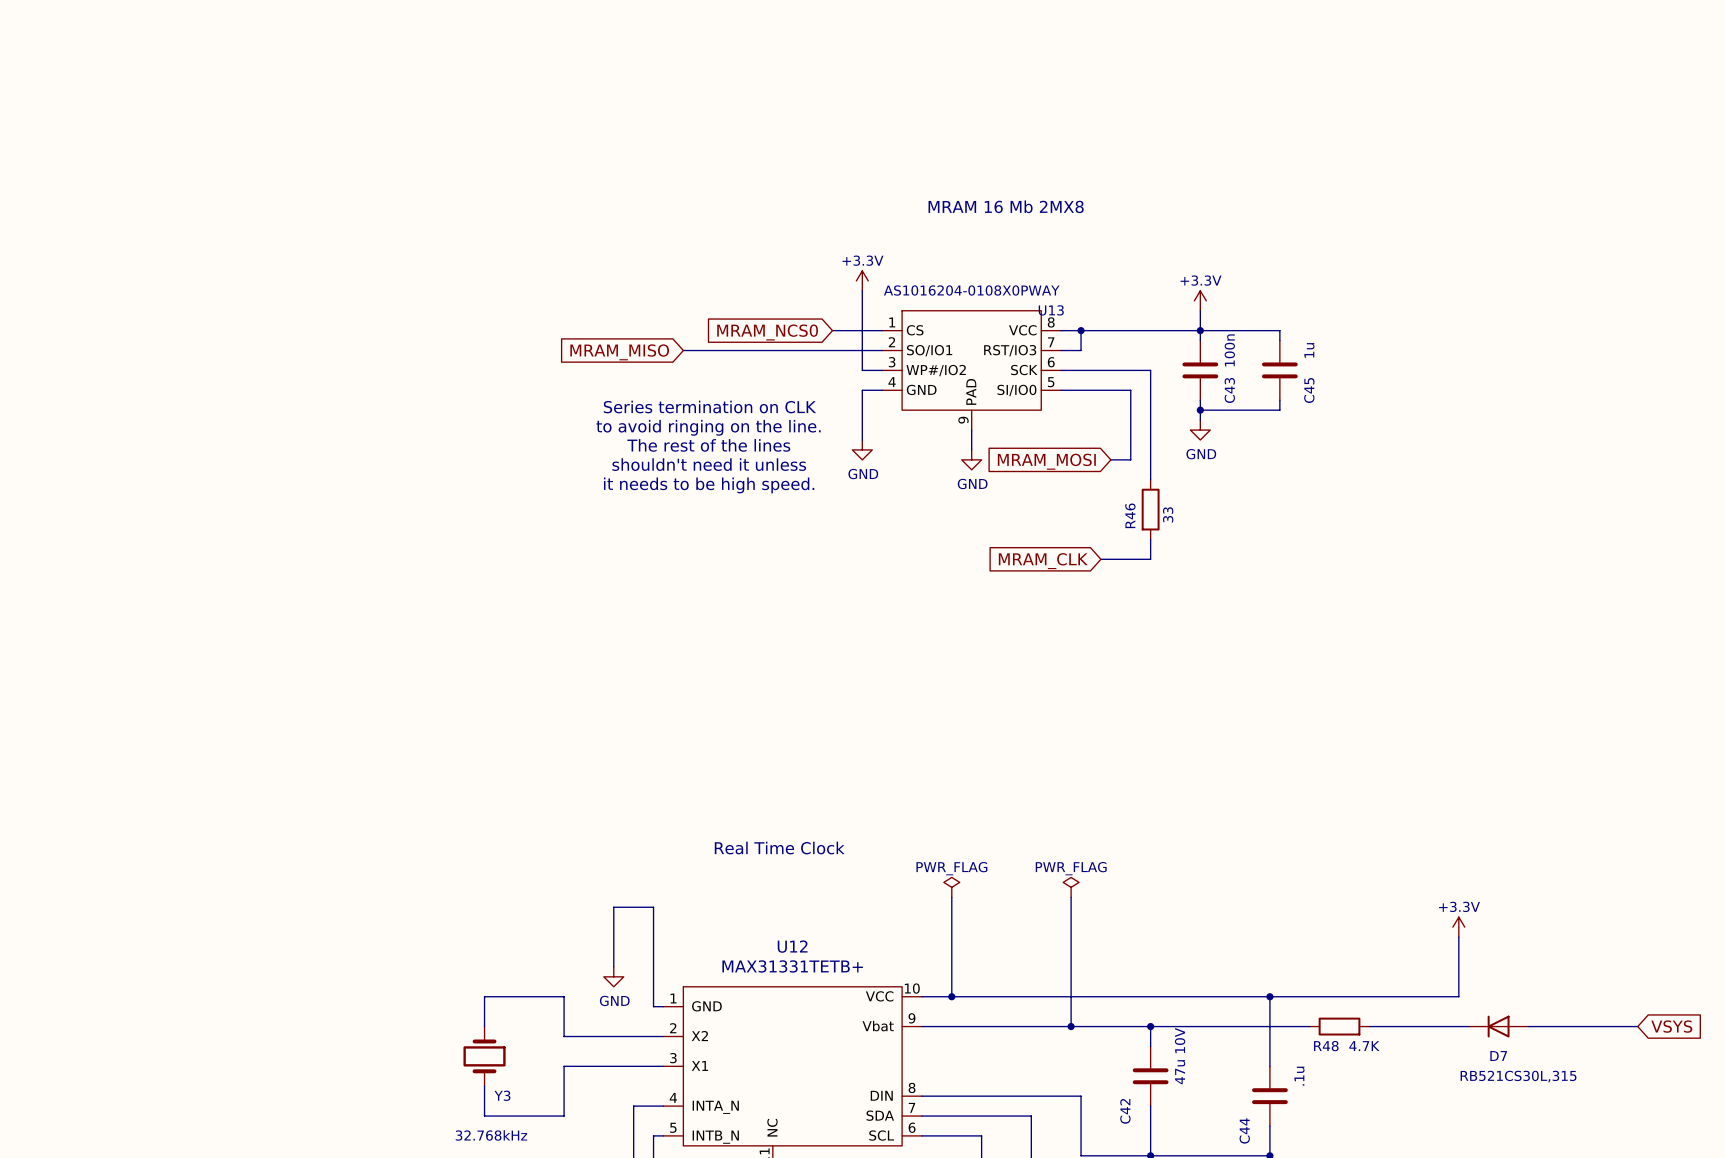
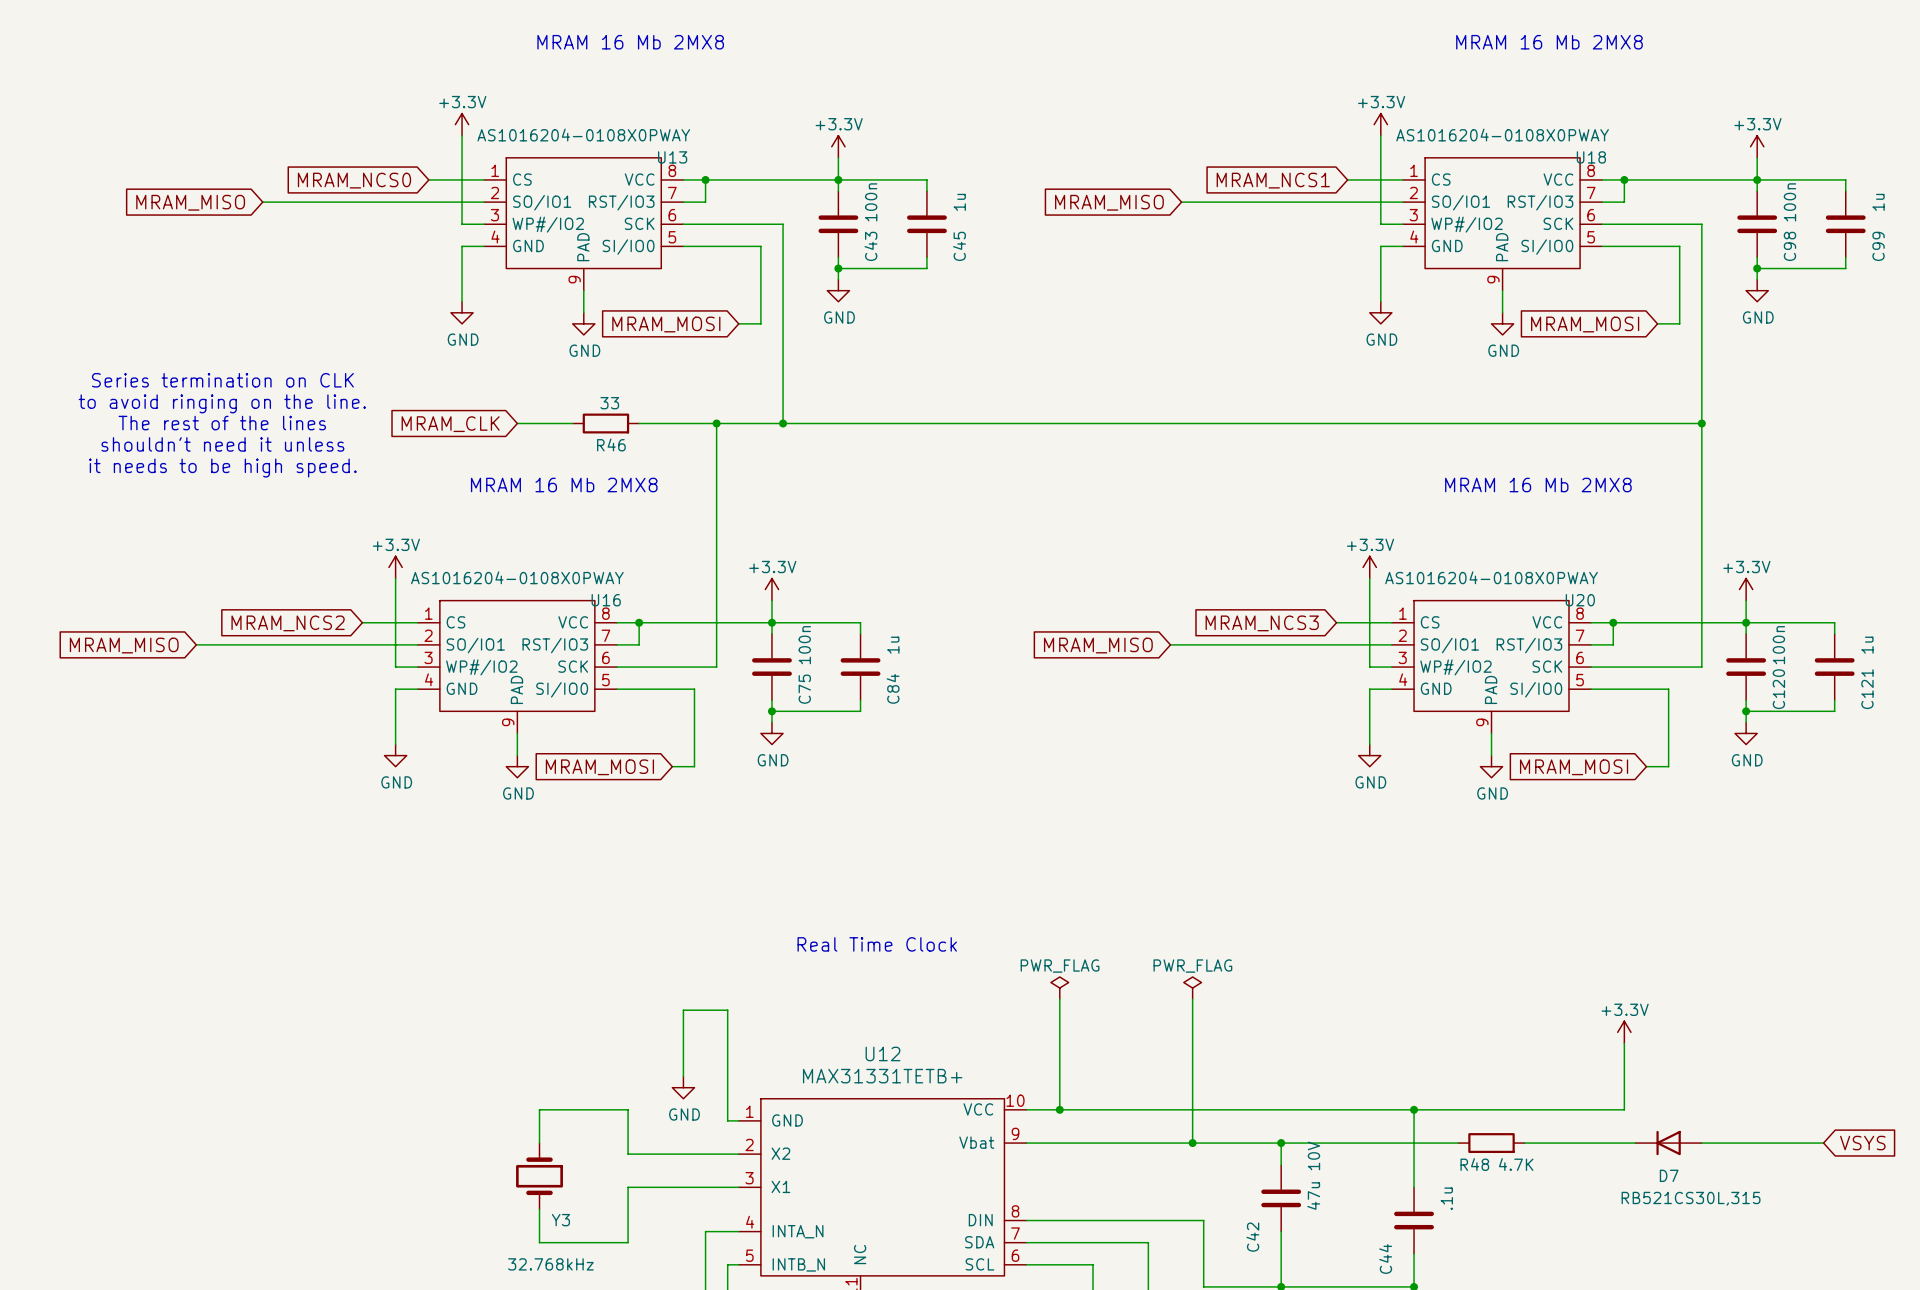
text: none -> MRAM 16 Mb 2MX8 (630, 42)
text: none -> MRAM 16 Mb 2MX8 (1549, 42)
power symbol: none -> +3.3V (462, 124)
power symbol: none -> +3.3V (1380, 124)
wire: none -> (462, 135) (462, 224) (484, 224)
wire: none -> (1380, 135) (1380, 224) (1402, 224)
power symbol: none -> +3.3V (838, 146)
power symbol: none -> +3.3V (1757, 146)
wire: none -> (838, 157) (838, 191)
wire: none -> (1757, 157) (1757, 191)
wire: none -> (428, 179) (484, 179)
wire: none -> (683, 179) (926, 179) (926, 191)
wire: none -> (705, 179) (705, 202) (683, 202)
junction: none -> (705, 179)
junction: none -> (838, 179)
wire: none -> (1347, 179) (1402, 179)
wire: none -> (1602, 179) (1845, 179) (1845, 191)
wire: none -> (1624, 179) (1624, 202) (1602, 202)
junction: none -> (1624, 179)
junction: none -> (1757, 179)
global label: none -> MRAM_NCS0 (354, 180)
global label: none -> MRAM_NCS1 (1273, 180)
wire: none -> (262, 202) (484, 202)
wire: none -> (1181, 202) (1402, 202)
global label: none -> MRAM_MISO (190, 202)
global label: none -> MRAM_MISO (1109, 202)
wire: none -> (683, 224) (783, 224) (783, 423)
U18: none -> AS1016204-0108X0PWAY (1502, 224)
wire: none -> (1602, 224) (1701, 224) (1701, 667) (1591, 667)
C98: none -> 100n (1757, 224)
C99: none -> 1u (1845, 224)
text: MRAM 16 Mb 2MX8 (1006, 206) -> none
wire: none -> (484, 246) (462, 246) (462, 301)
wire: none -> (683, 246) (760, 246) (760, 323) (738, 323)
wire: none -> (1402, 246) (1380, 246) (1380, 301)
wire: none -> (1602, 246) (1679, 246) (1679, 323) (1657, 323)
wire: none -> (838, 257) (838, 279)
wire: none -> (926, 257) (926, 268) (838, 268)
wire: none -> (1757, 257) (1757, 279)
wire: none -> (1845, 257) (1845, 268) (1757, 268)
junction: none -> (838, 268)
junction: none -> (1757, 268)
wire: none -> (583, 290) (583, 312)
power symbol: none -> GND (838, 290)
wire: none -> (1502, 290) (1502, 312)
power symbol: none -> GND (1757, 290)
power symbol: none -> GND (462, 312)
power symbol: +3.3V (862, 280) -> none
power symbol: none -> GND (1380, 312)
power symbol: none -> GND (583, 323)
wire: (862, 290) (862, 370) (882, 370) -> none
power symbol: none -> GND (1502, 323)
global label: none -> MRAM_MOSI (666, 324)
global label: none -> MRAM_MOSI (1585, 324)
power symbol: +3.3V (1200, 300) -> none
wire: (1200, 310) (1200, 340) -> none
wire: (832, 330) (882, 330) -> none
wire: (1061, 330) (1279, 330) (1279, 340) -> none
wire: (1081, 330) (1081, 350) (1061, 350) -> none
junction: (1081, 330) -> none
junction: (1200, 330) -> none
global label: MRAM_NCS0 (767, 332) -> none
text: none -> Series termination on CLK (222, 380)
wire: (683, 350) (882, 350) -> none
global label: MRAM_MISO (619, 352) -> none
text: none -> to avoid ringing on the line. (222, 403)
U13 position: (971, 370) -> (583, 224)
wire: (1061, 370) (1150, 370) (1150, 479) -> none
C43 position: (1200, 370) -> (838, 224)
C45 position: (1279, 370) -> (926, 224)
text: none -> The rest of the lines (222, 423)
wire: none -> (517, 423) (572, 423)
wire: none -> (639, 423) (1701, 423)
wire: none -> (716, 423) (716, 667) (616, 667)
junction: none -> (716, 423)
junction: none -> (783, 423)
junction: none -> (1701, 423)
global label: none -> MRAM_CLK (450, 424)
wire: (882, 390) (862, 390) (862, 440) -> none
wire: (1061, 390) (1130, 390) (1130, 459) (1110, 459) -> none
text: none -> shouldn't need it unless (222, 444)
wire: (1200, 400) (1200, 420) -> none
wire: (1279, 400) (1279, 410) (1200, 410) -> none
text: Series termination on CLK (709, 407) -> none
junction: (1200, 410) -> none
text: none -> it needs to be high speed. (222, 468)
text: to avoid ringing on the line. (708, 427) -> none
wire: (971, 430) (971, 449) -> none
power symbol: GND (1200, 430) -> none
text: none -> MRAM 16 Mb 2MX8 (564, 485)
text: none -> MRAM 16 Mb 2MX8 (1538, 485)
text: The rest of the lines (708, 445) -> none
power symbol: GND (862, 449) -> none
power symbol: GND (971, 459) -> none
global label: MRAM_MOSI (1046, 461) -> none
text: shouldn't need it unless (709, 464) -> none
text: it needs to be high speed. (709, 485) -> none
power symbol: none -> +3.3V (395, 567)
R46 rotation: 0° (1150, 509) -> 90° clockwise (605, 423)
R46 position: (1150, 509) -> (605, 423)
power symbol: none -> +3.3V (1369, 567)
R46 value position: 33 (1168, 514) -> 33 (609, 403)
R46 name position: R46 (1130, 515) -> R46 (611, 444)
wire: none -> (395, 578) (395, 667) (417, 667)
wire: none -> (1369, 578) (1369, 667) (1391, 667)
power symbol: none -> +3.3V (771, 589)
power symbol: none -> +3.3V (1746, 589)
wire: none -> (771, 600) (771, 633)
wire: (1150, 539) (1150, 559) (1100, 559) -> none
wire: none -> (1746, 600) (1746, 633)
wire: none -> (362, 622) (417, 622)
wire: none -> (616, 622) (860, 622) (860, 633)
wire: none -> (639, 622) (639, 644) (616, 644)
junction: none -> (639, 622)
junction: none -> (771, 622)
wire: none -> (1336, 622) (1391, 622)
wire: none -> (1591, 622) (1834, 622) (1834, 633)
wire: none -> (1613, 622) (1613, 644) (1591, 644)
junction: none -> (1613, 622)
junction: none -> (1746, 622)
global label: none -> MRAM_NCS2 (288, 623)
global label: MRAM_CLK (1043, 561) -> MRAM_NCS3 (1262, 623)
wire: none -> (196, 644) (417, 644)
wire: none -> (1170, 644) (1391, 644)
global label: none -> MRAM_MISO (124, 645)
global label: none -> MRAM_MISO (1098, 645)
U16: none -> AS1016204-0108X0PWAY (517, 667)
C75: none -> 100n (771, 667)
C84: none -> 1u (860, 667)
U20: none -> AS1016204-0108X0PWAY (1491, 667)
C120: none -> 100n (1746, 667)
C121: none -> 1u (1834, 667)
wire: none -> (417, 689) (395, 689) (395, 744)
wire: none -> (616, 689) (694, 689) (694, 766) (672, 766)
wire: none -> (1391, 689) (1369, 689) (1369, 744)
wire: none -> (1591, 689) (1668, 689) (1668, 766) (1646, 766)
wire: none -> (771, 700) (771, 722)
wire: none -> (860, 700) (860, 711) (771, 711)
wire: none -> (1746, 700) (1746, 722)
wire: none -> (1834, 700) (1834, 711) (1746, 711)
junction: none -> (771, 711)
junction: none -> (1746, 711)
wire: none -> (517, 733) (517, 755)
power symbol: none -> GND (771, 733)
wire: none -> (1491, 733) (1491, 755)
power symbol: none -> GND (1746, 733)
power symbol: none -> GND (395, 755)
power symbol: none -> GND (1369, 755)
power symbol: none -> GND (517, 766)
power symbol: none -> GND (1491, 766)
global label: none -> MRAM_MOSI (599, 767)
global label: none -> MRAM_MOSI (1574, 767)

